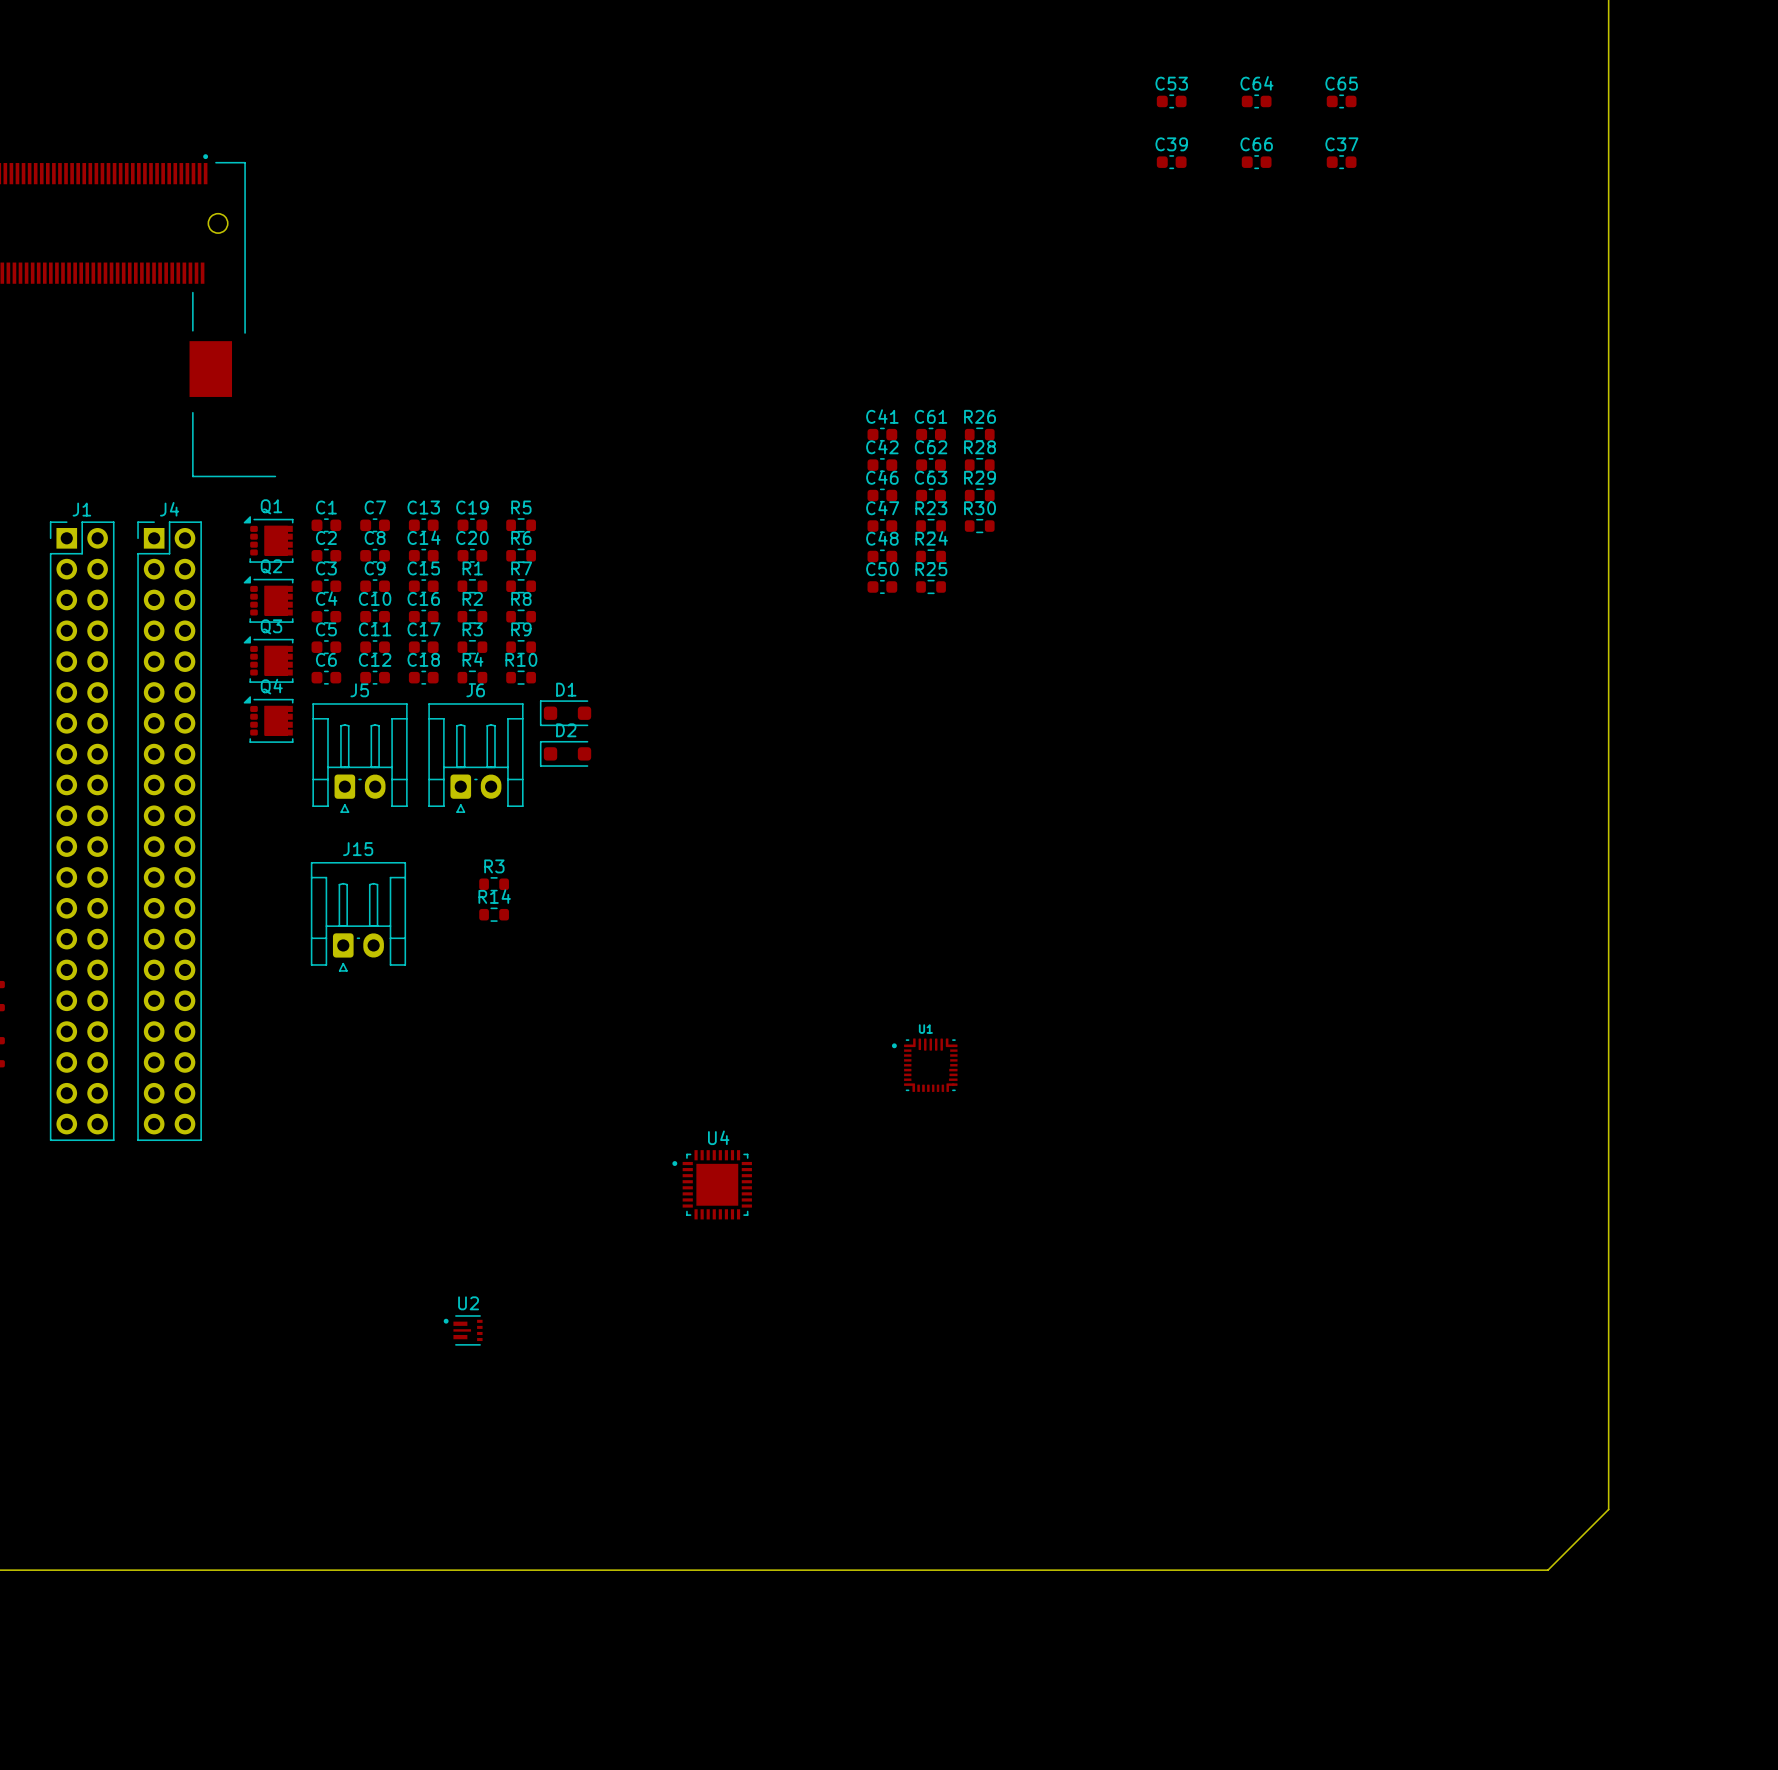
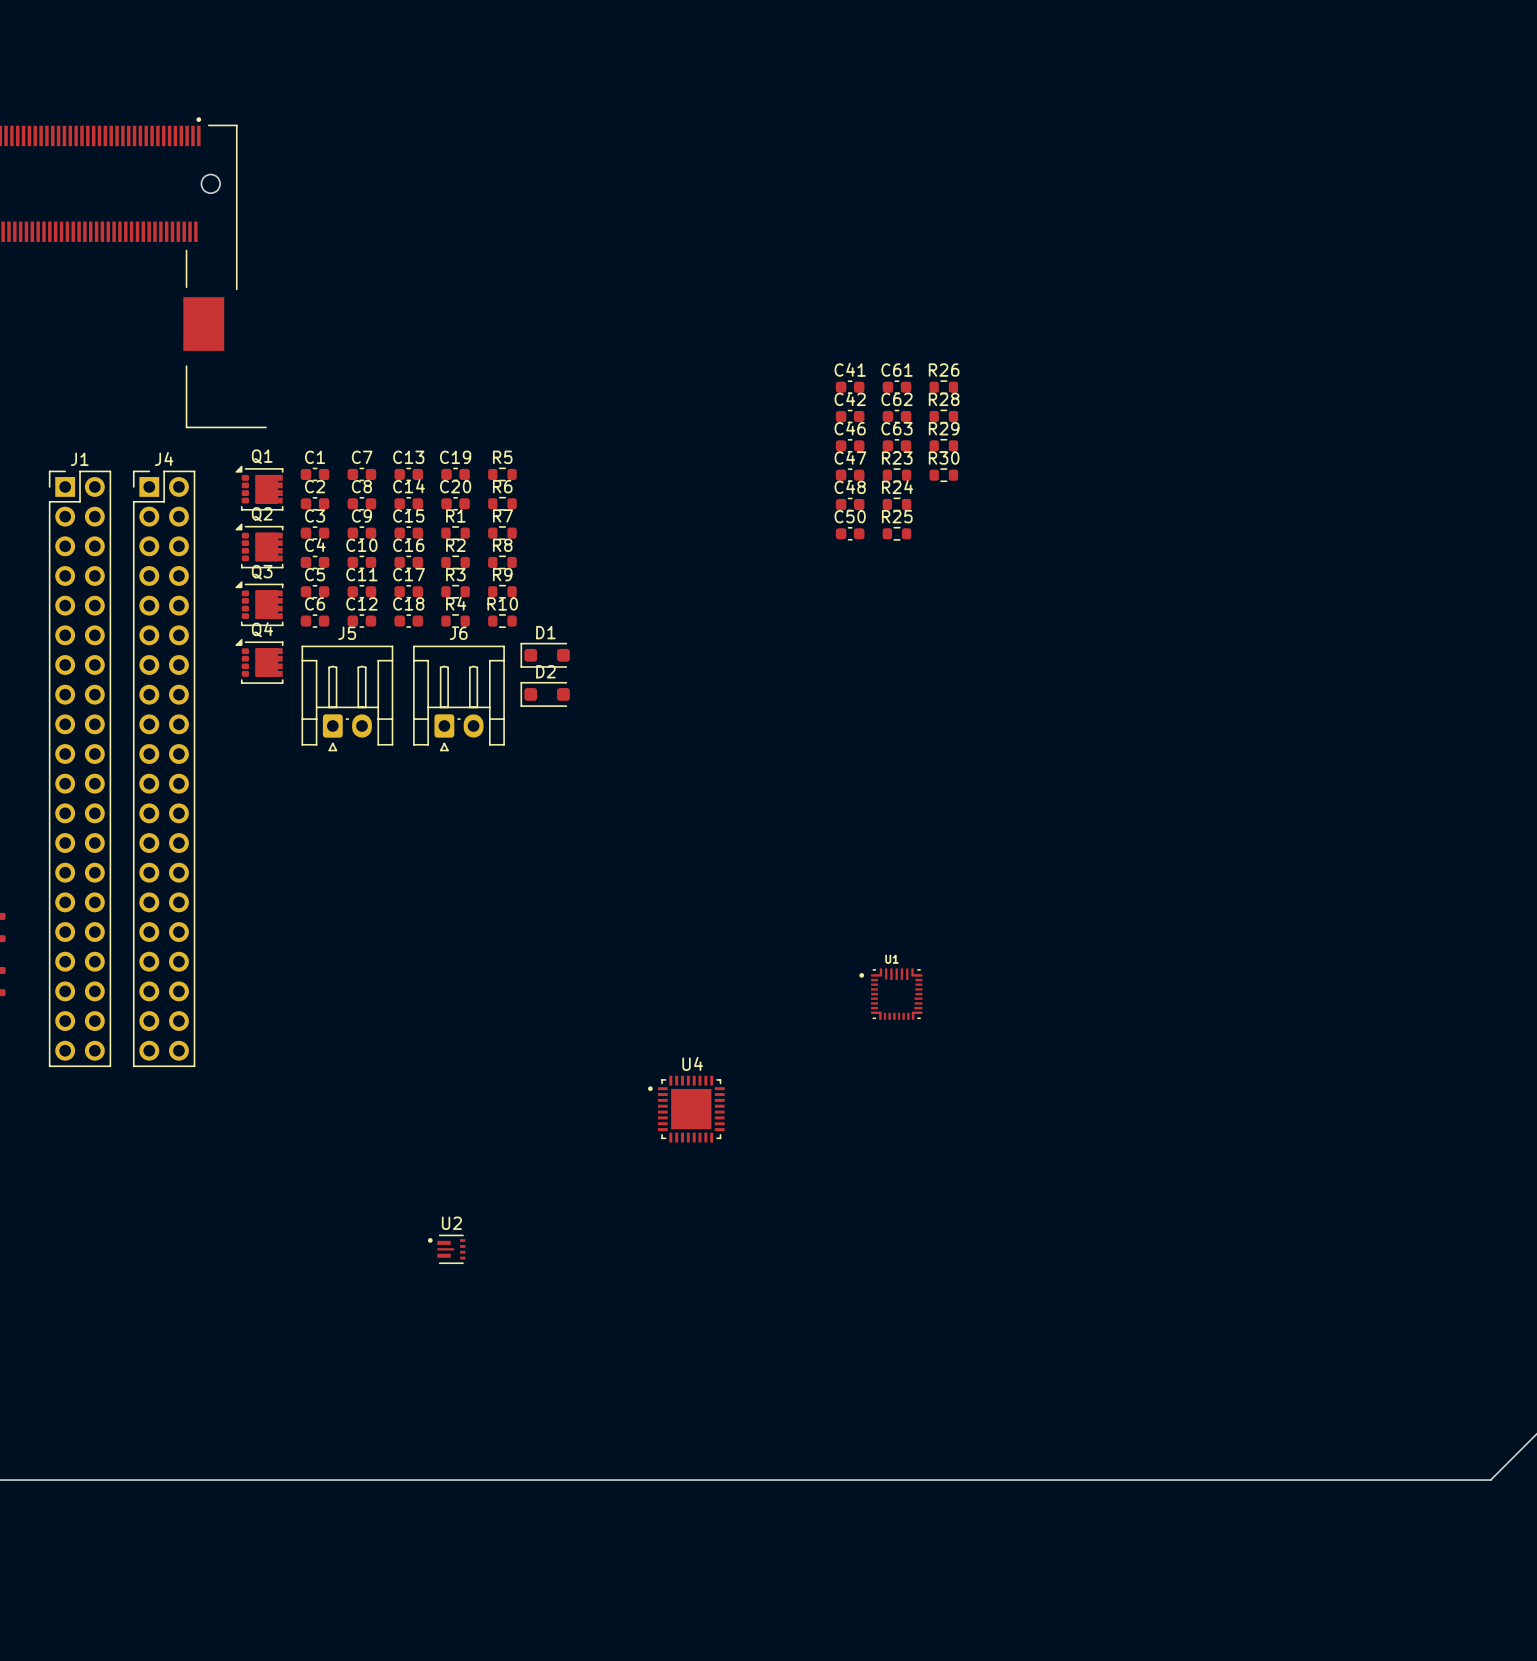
C53: (1171, 101) -> none
C64: (1256, 101) -> none
C65: (1341, 101) -> none
C39: (1171, 162) -> none
C66: (1256, 162) -> none
C37: (1341, 162) -> none
R3: (494, 884) -> none
R14: (494, 914) -> none
J15: (358, 916) -> none

